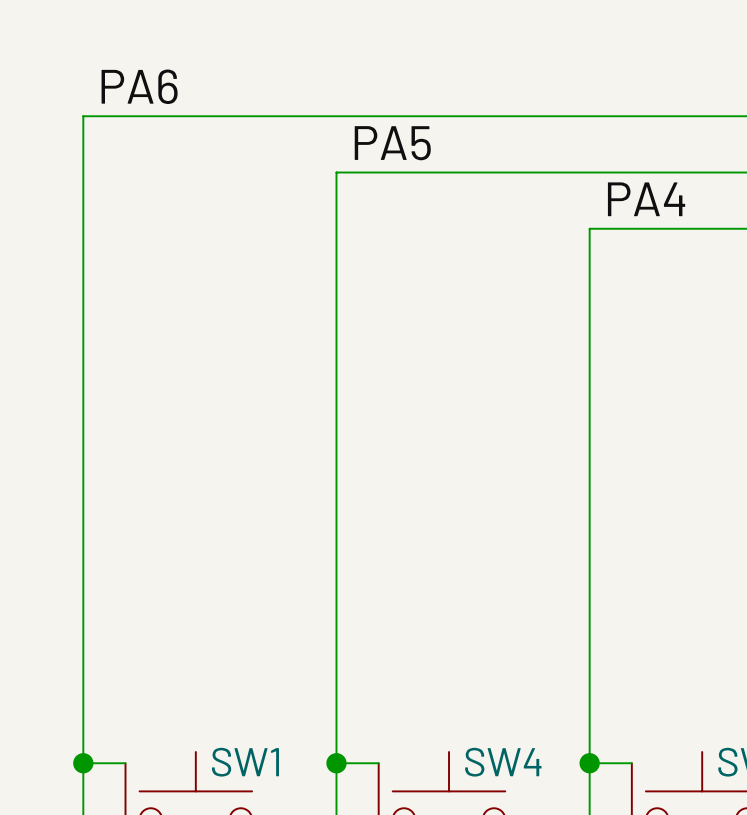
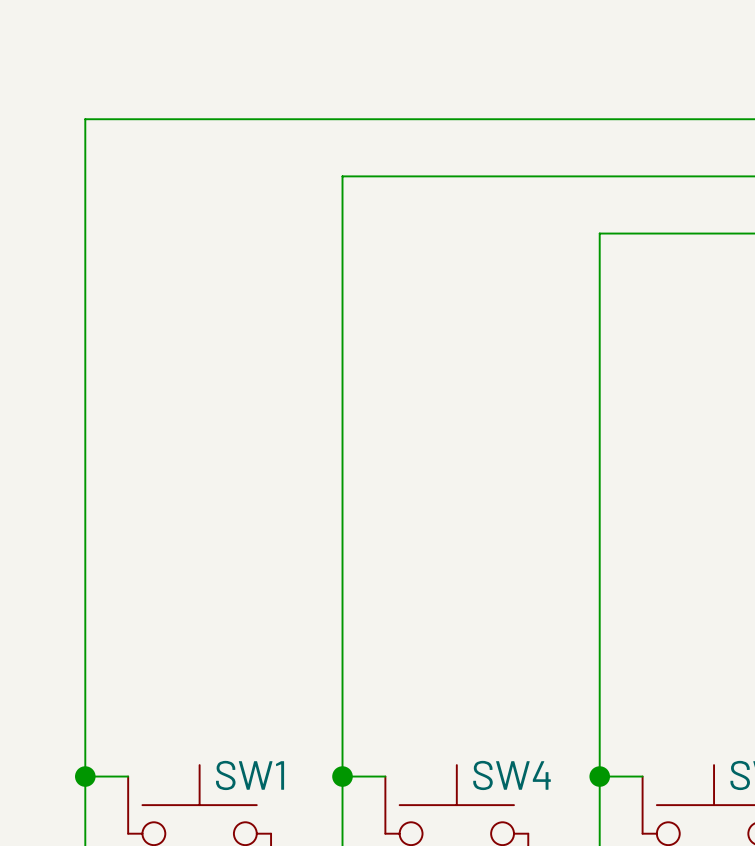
label: PA6 (139, 86) -> none
label: PA5 (392, 143) -> none
label: PA4 (646, 199) -> none

